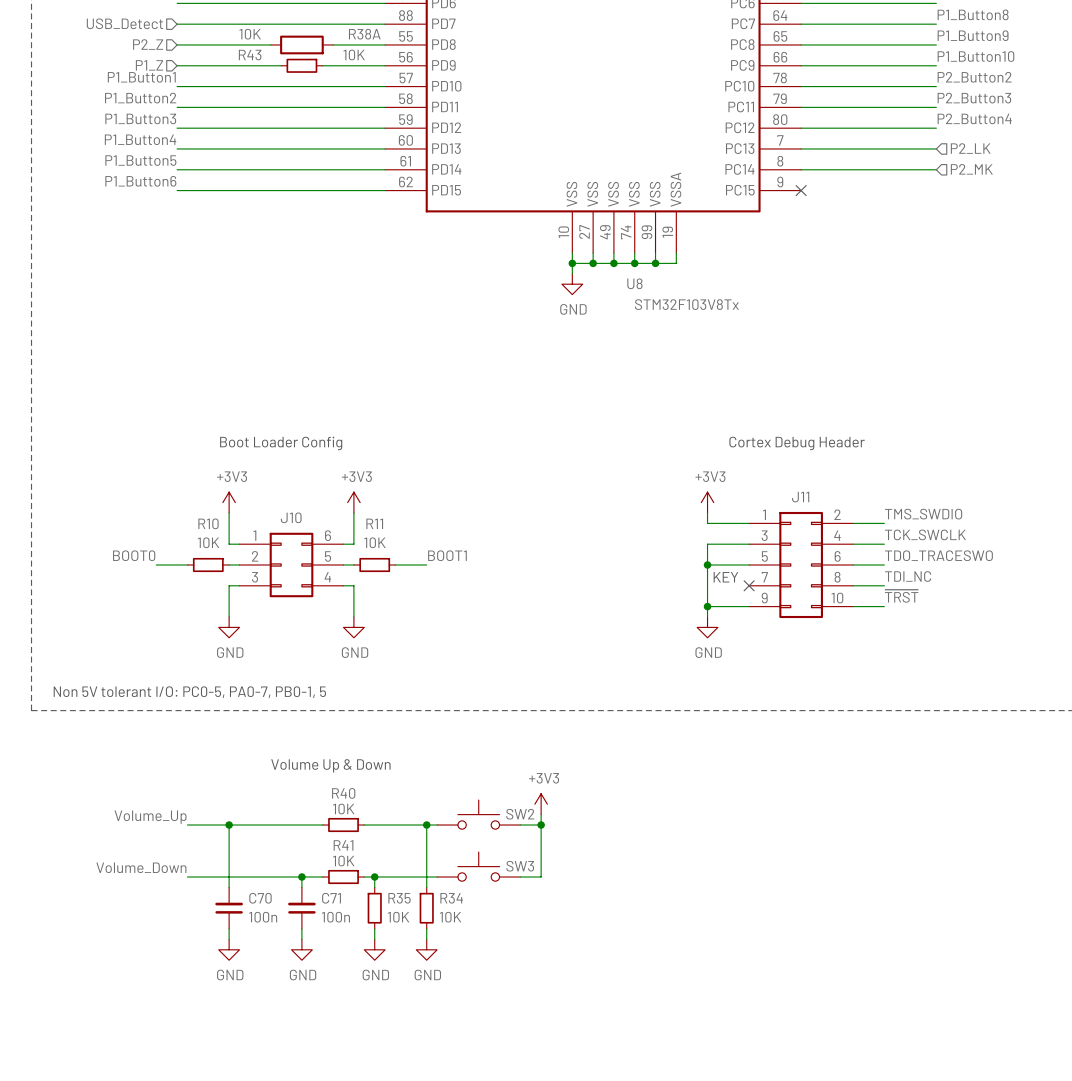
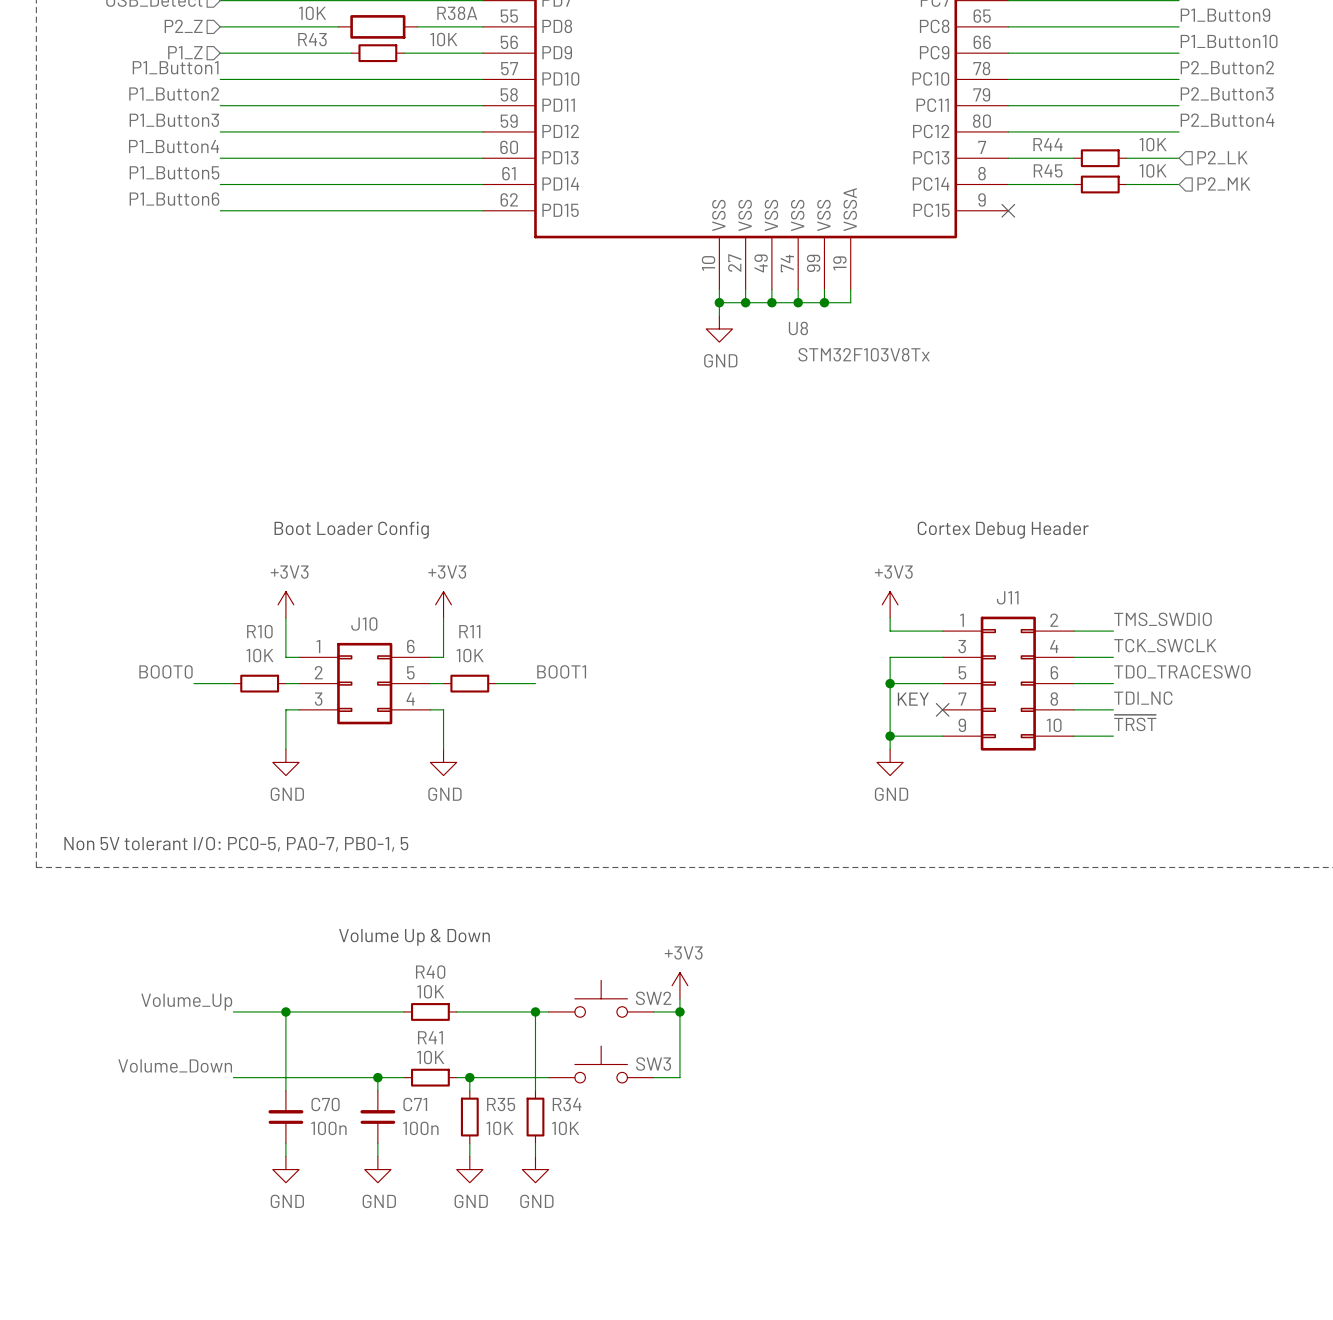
wire: (853, 148) (894, 148) -> none
R44: none -> 10K (1100, 158)
wire: (853, 169) (894, 169) -> none
R45: none -> 10K (1100, 184)

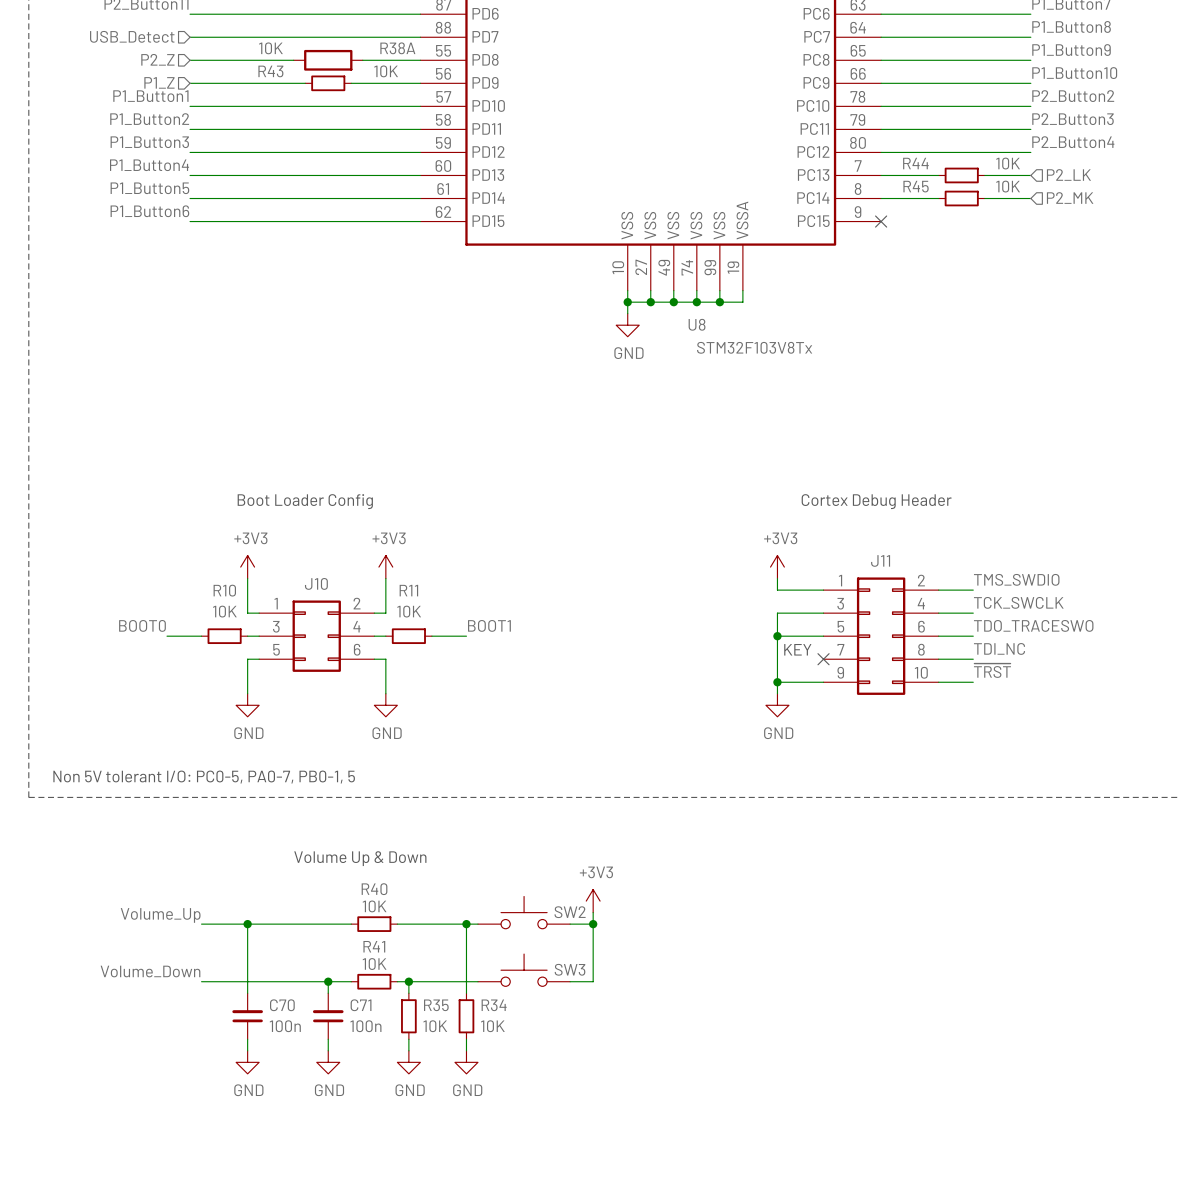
J10 pin number: 6 (410, 646) -> 2 (357, 603)
J10 pin number: 2 (318, 672) -> 3 (276, 626)
J10 pin number: 5 (410, 672) -> 4 (356, 626)
J10 pin number: 3 (318, 699) -> 5 (276, 649)
J10 pin number: 4 (410, 699) -> 6 (357, 649)

